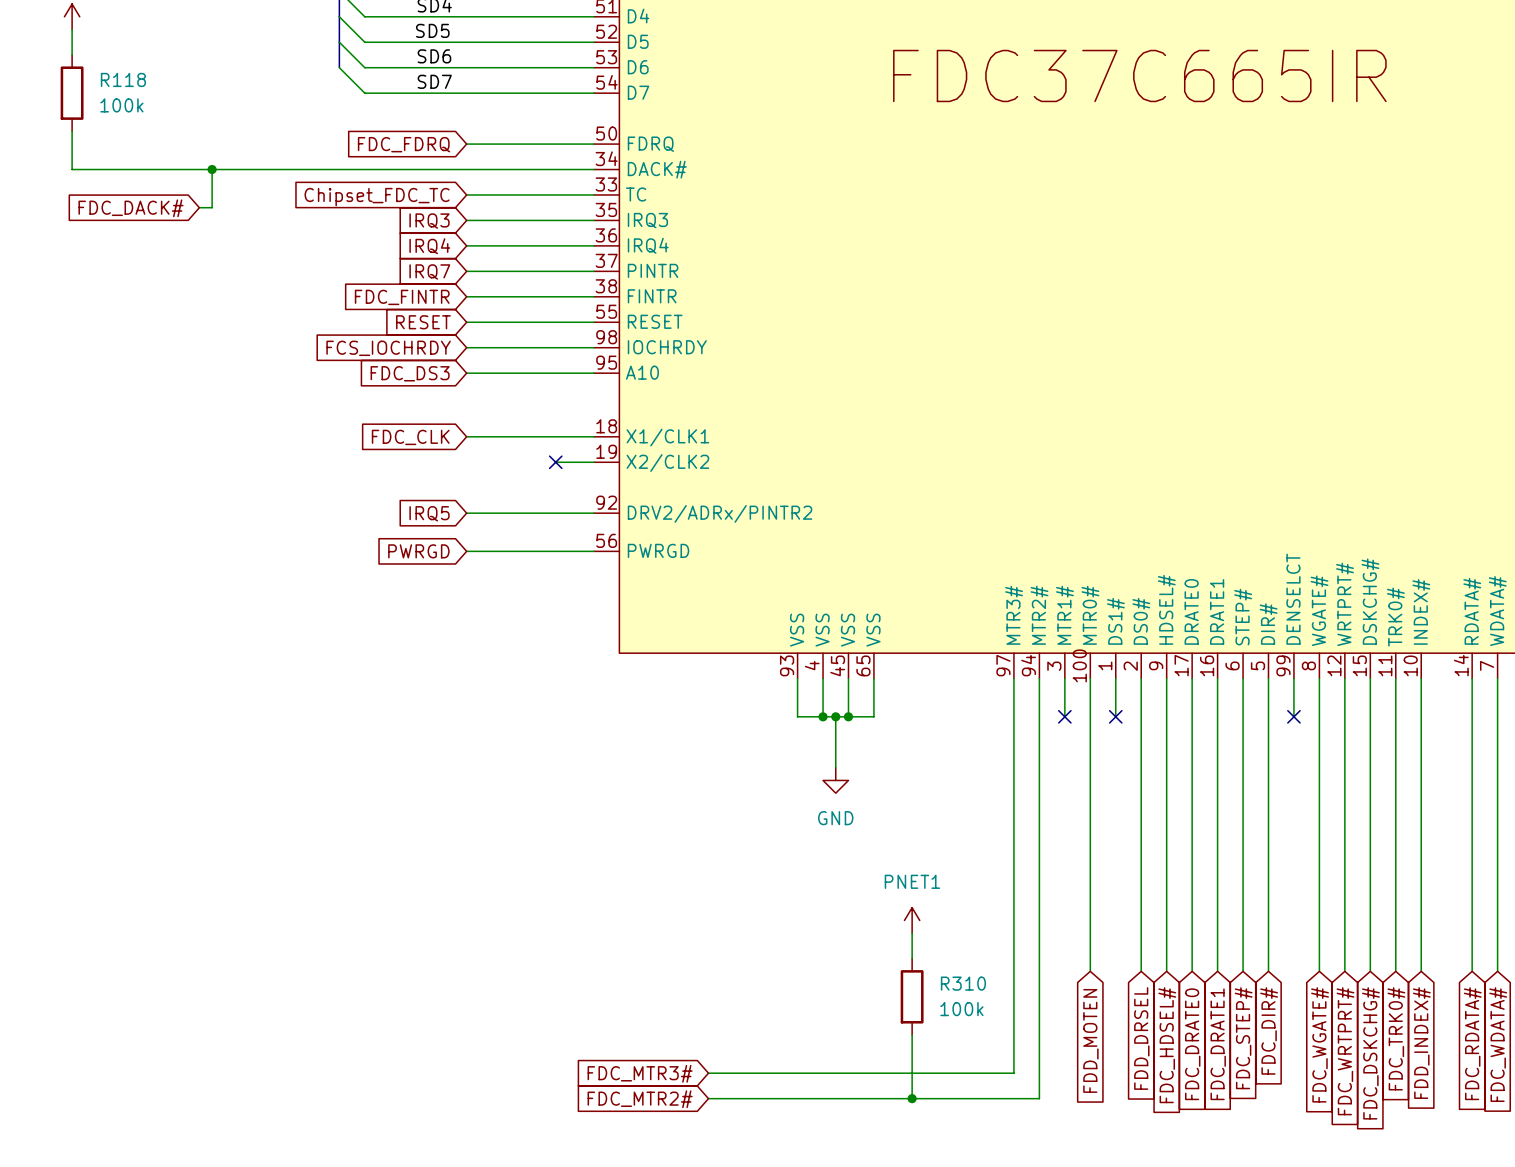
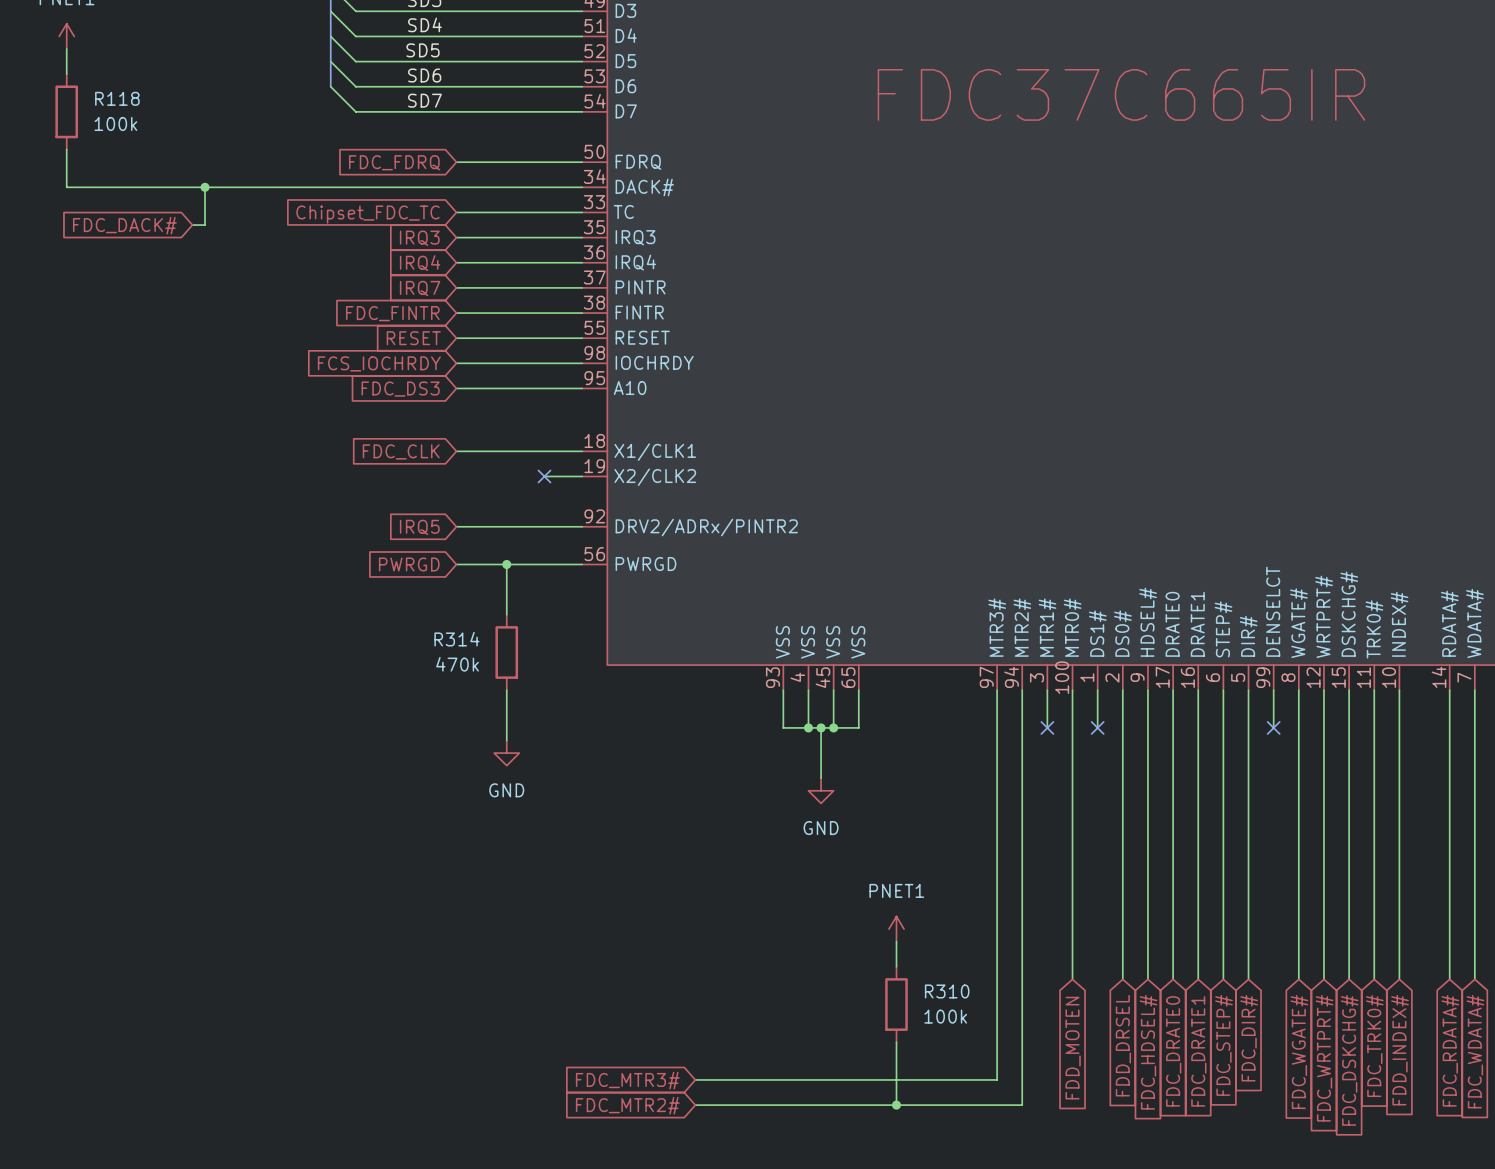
wire: none -> (506, 564) (506, 614)
junction: none -> (506, 564)
R314: none -> 470k (506, 652)
wire: none -> (506, 690) (506, 740)
power symbol: none -> GND (506, 753)

